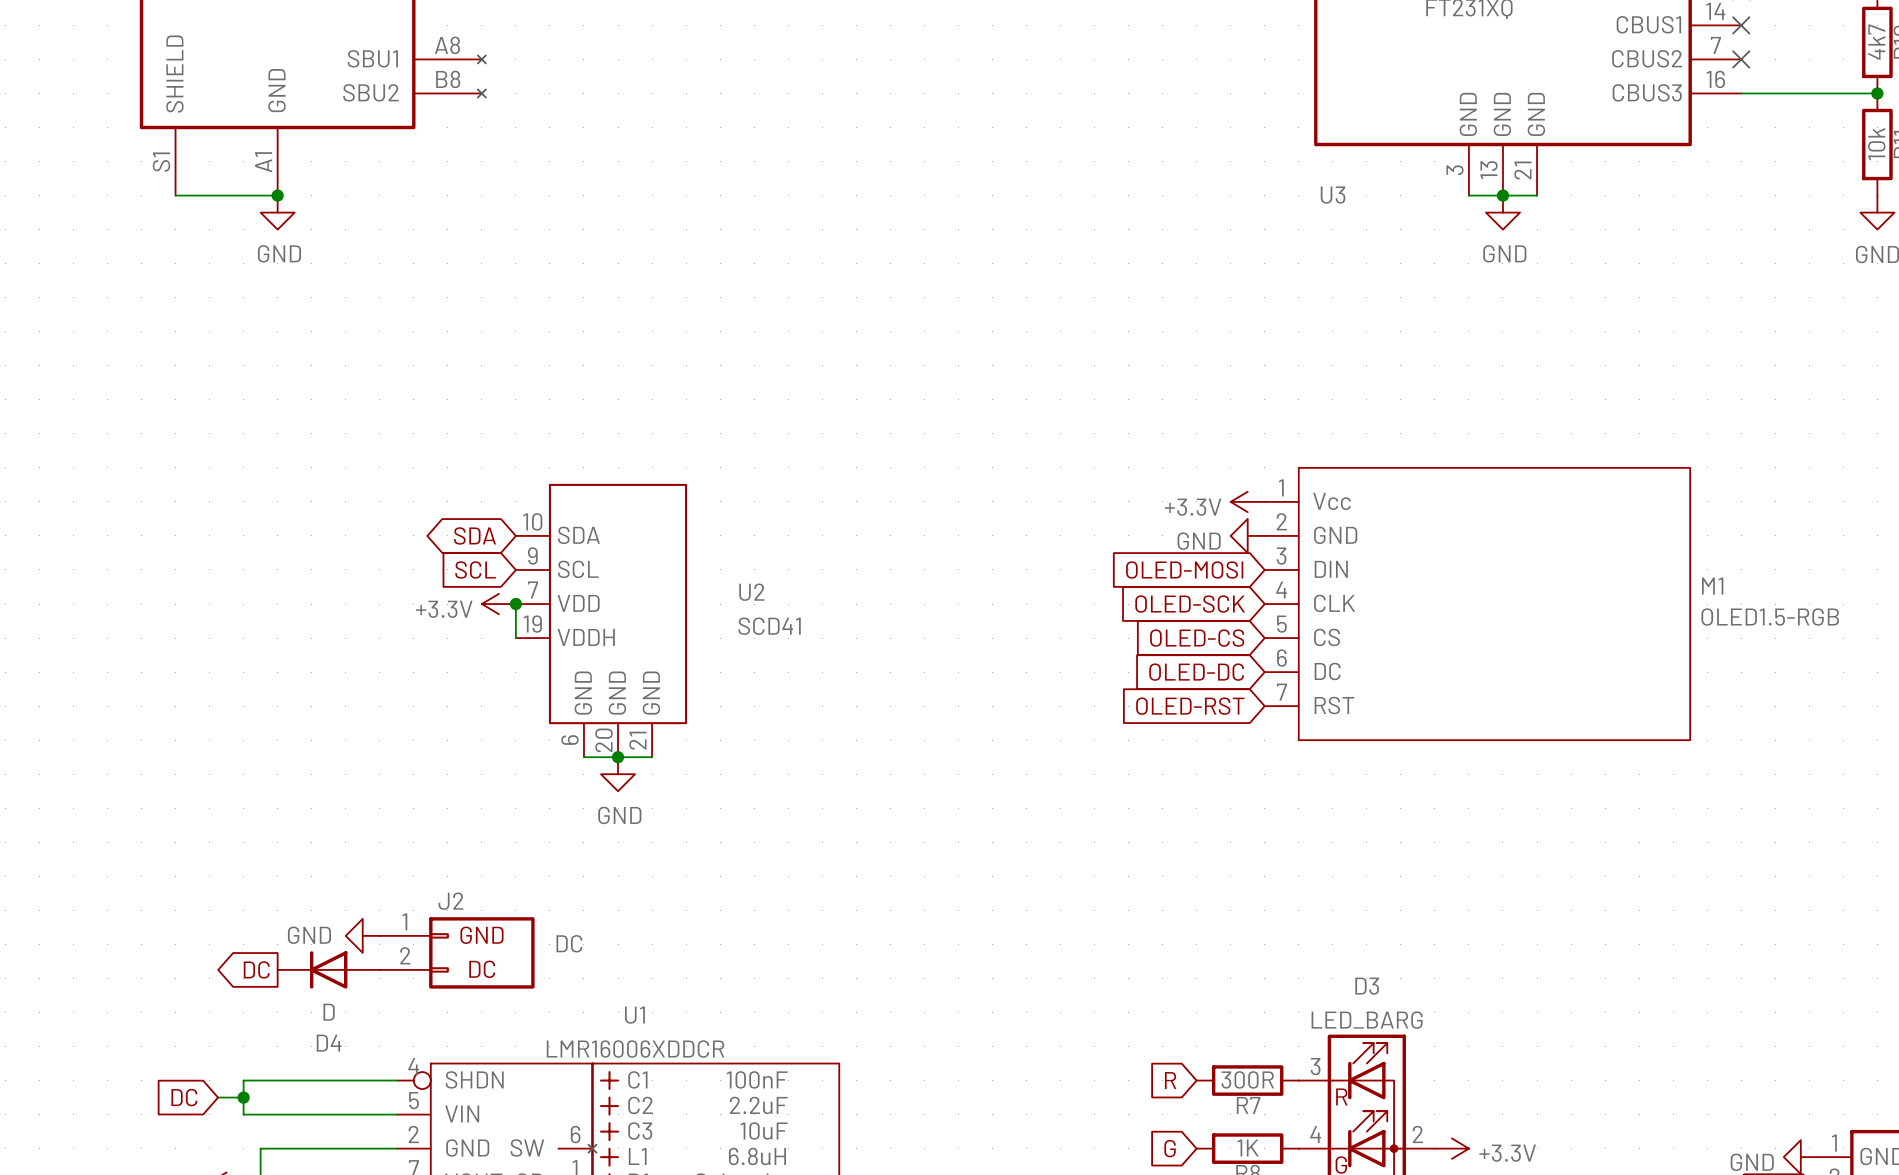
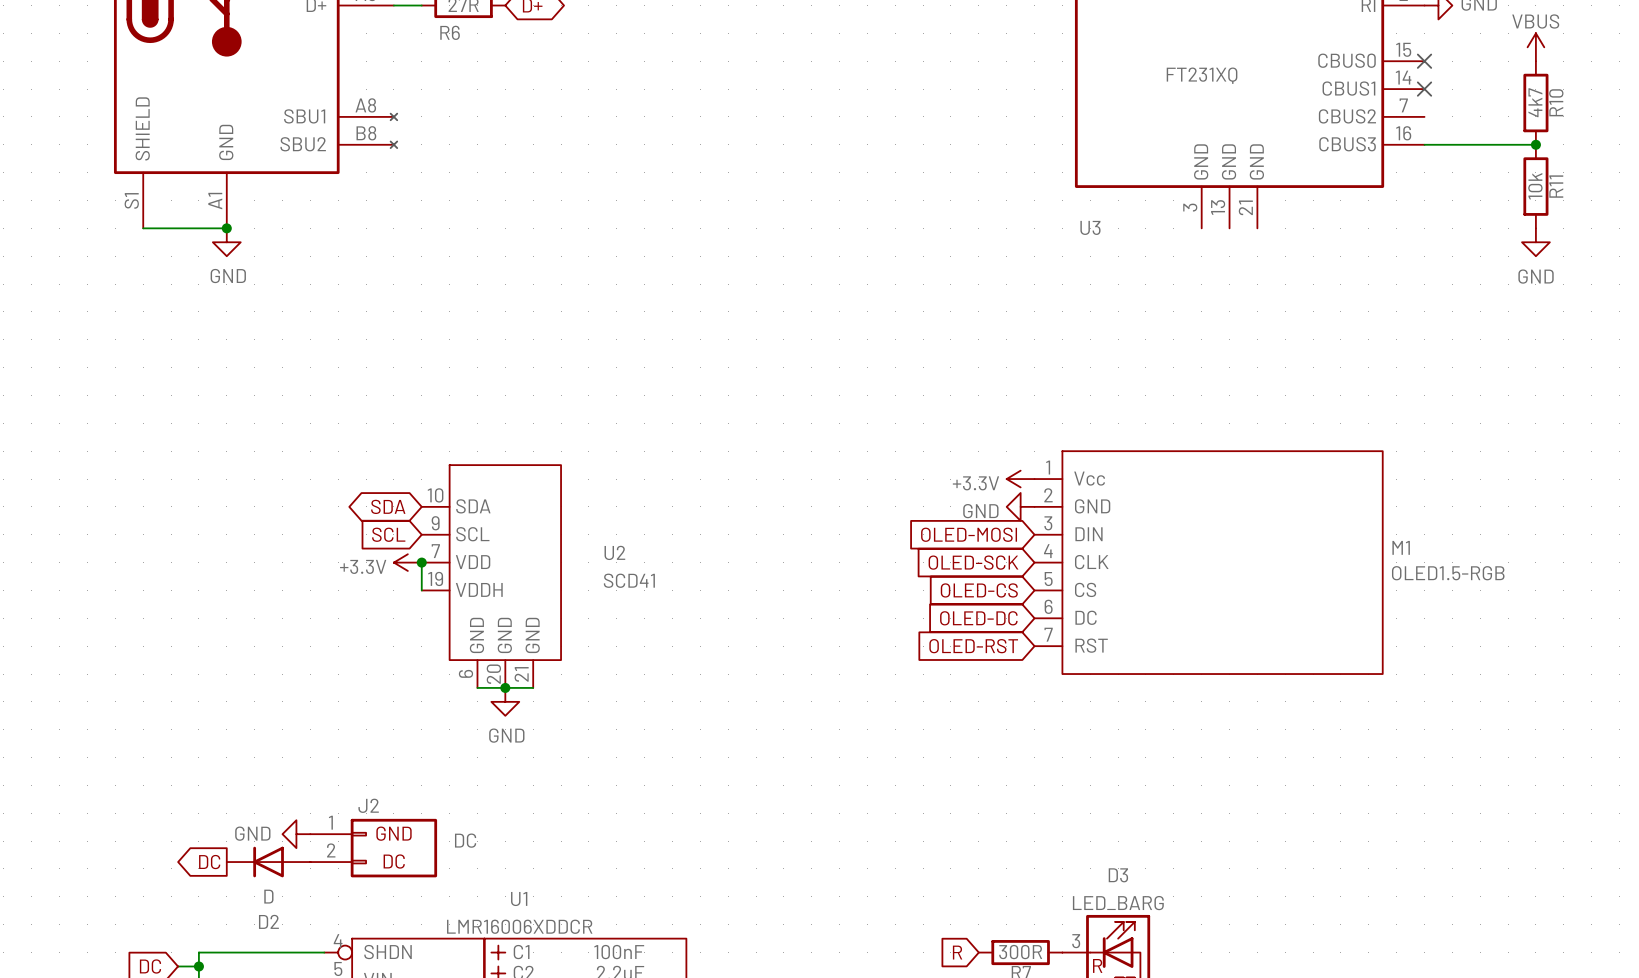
no-connect mark: (1741, 59) -> none
wire: (1468, 195) (1537, 195) -> none
junction: (1502, 195) -> none
power symbol: GND (1502, 212) -> none
D4 name: D4 (329, 1043) -> D2 (268, 921)

